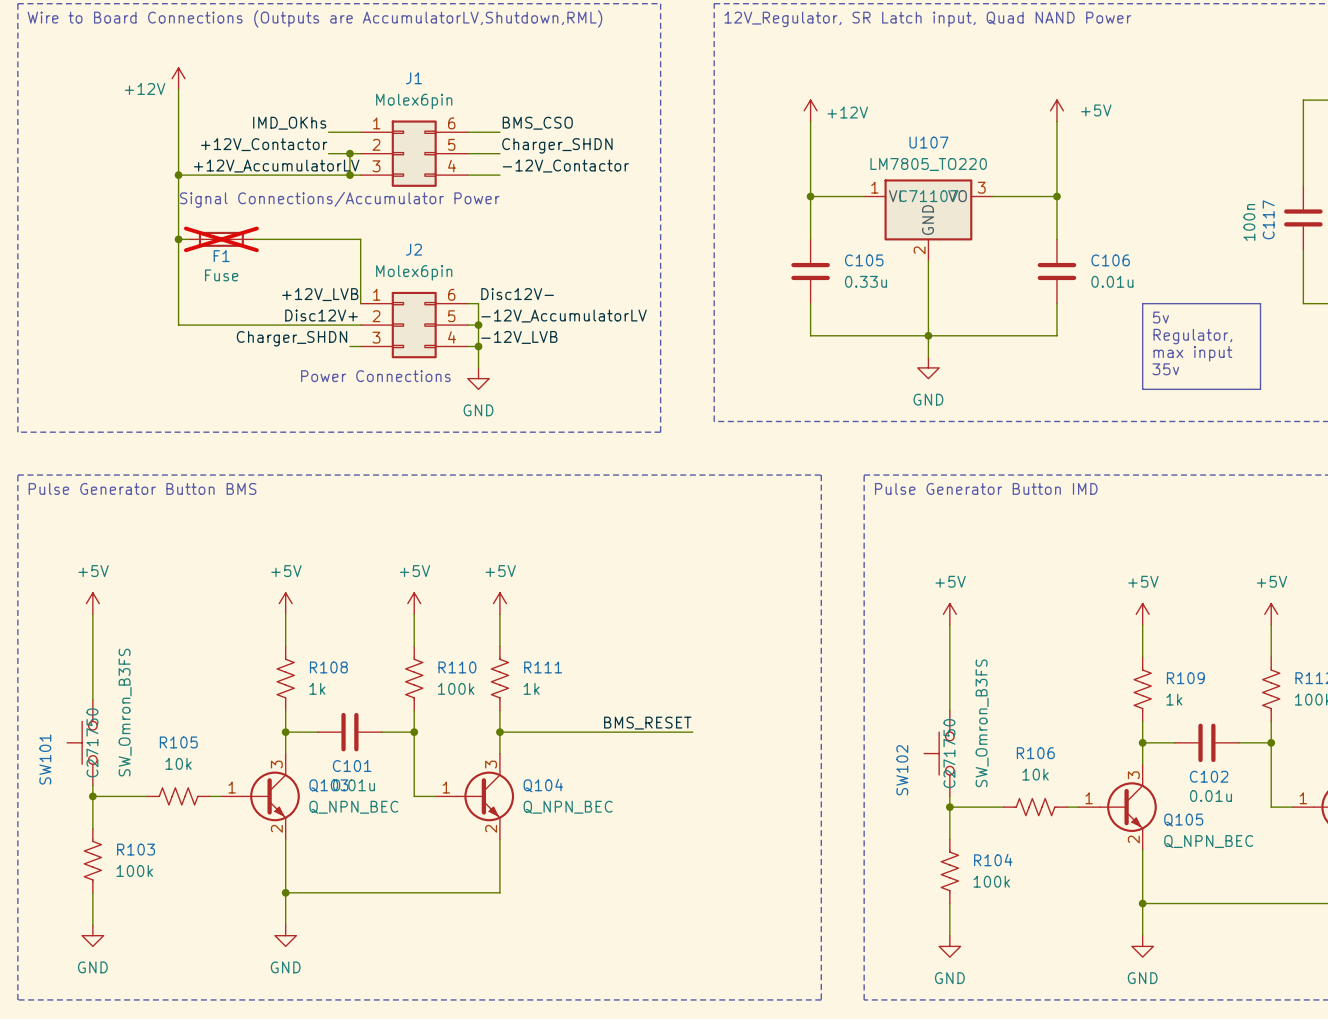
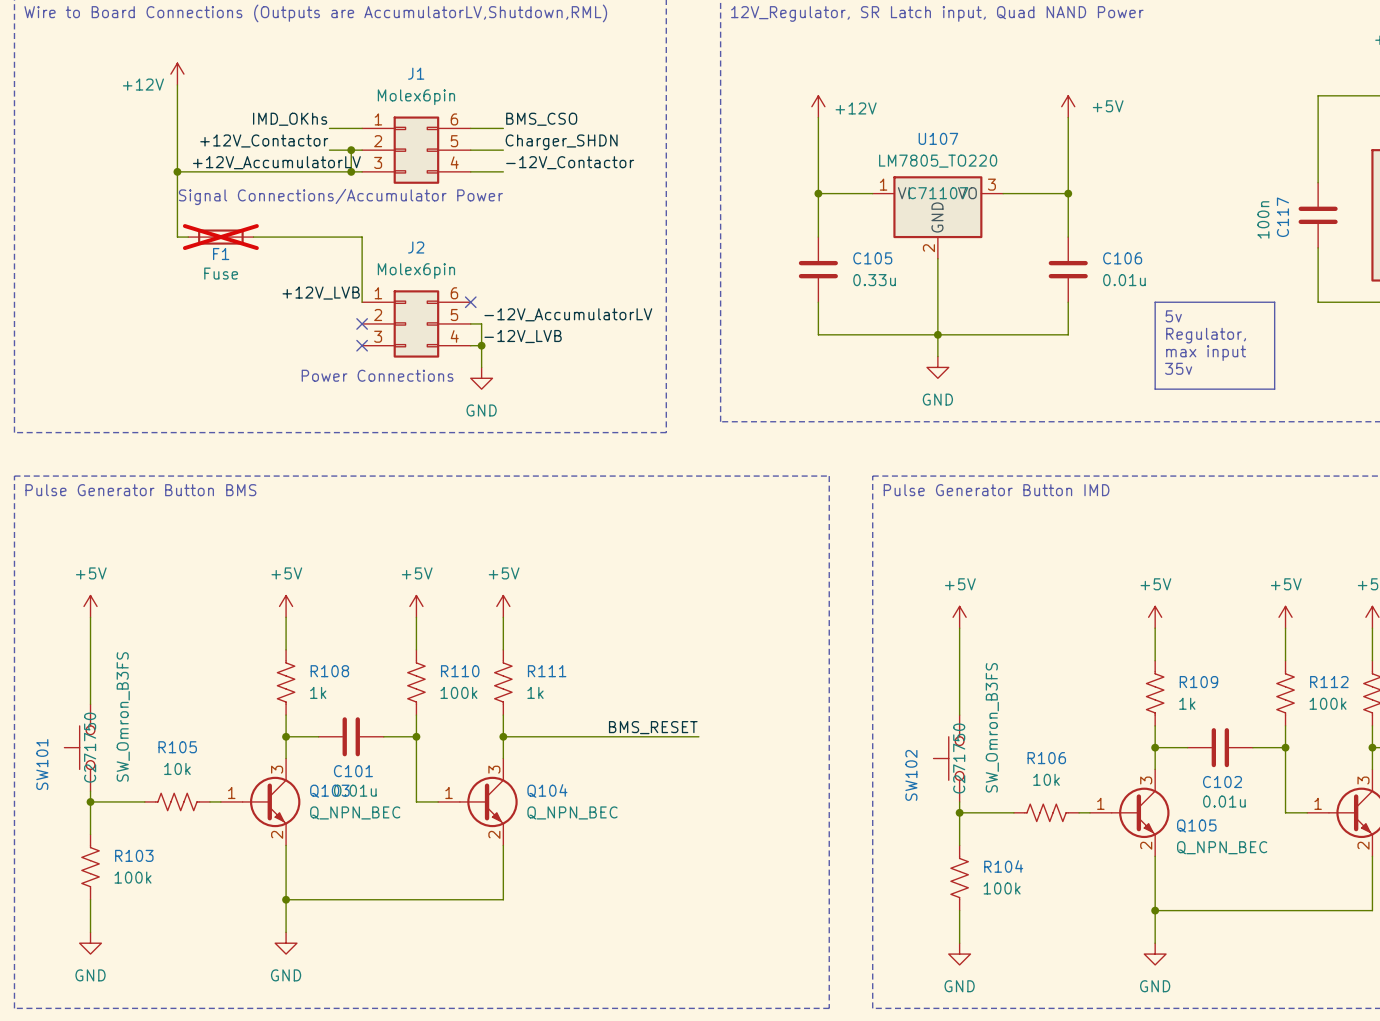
wire: (178, 239) (178, 325) (360, 325) -> none
junction: (178, 239) -> none
label: Disc12V- (517, 294) -> none
wire: (467, 303) (478, 303) (478, 325) -> none
no-connect mark: none -> (470, 302)
label: Disc12V+ (321, 315) -> none
no-connect mark: none -> (362, 323)
junction: (478, 325) -> none
label: Charger_SHDN (291, 338) -> none
wire: (349, 346) (360, 346) -> none
no-connect mark: none -> (362, 345)

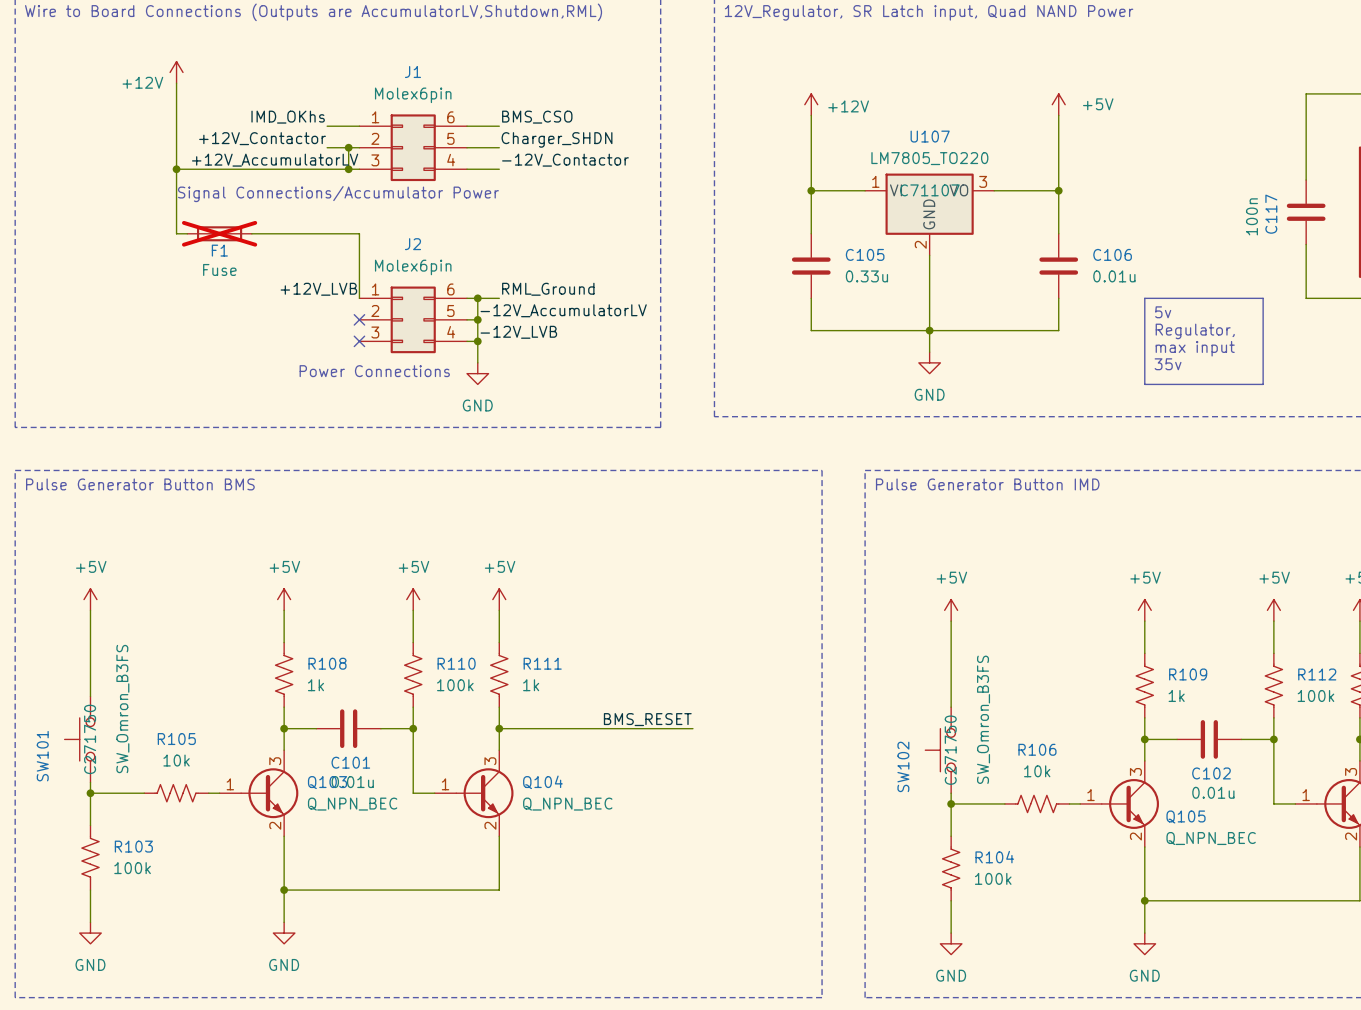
label: none -> RML_Ground (548, 289)
wire: none -> (467, 298) (499, 298)
no-connect mark: (470, 302) -> none
wire: none -> (477, 298) (477, 319)
junction: none -> (477, 298)
junction: none -> (477, 319)

